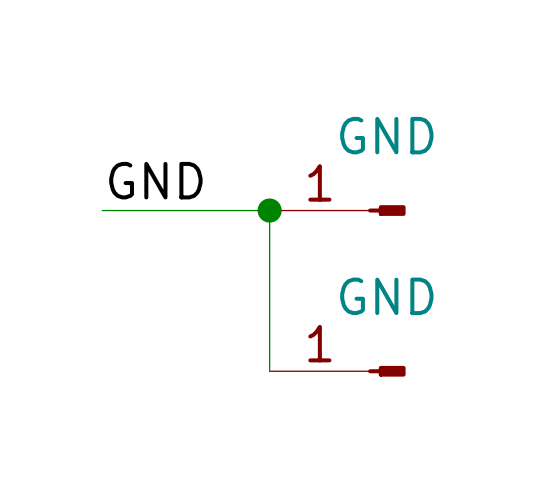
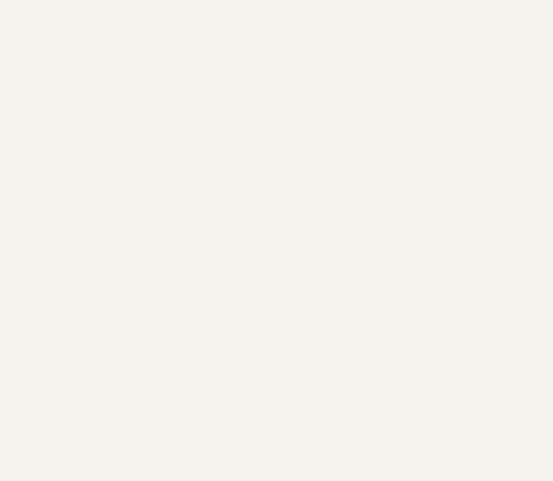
label: GND (155, 180) -> none
wire: (102, 210) (269, 210) (269, 371) -> none
junction: (269, 210) -> none
part: GND (337, 210) -> none
part: GND (337, 371) -> none

